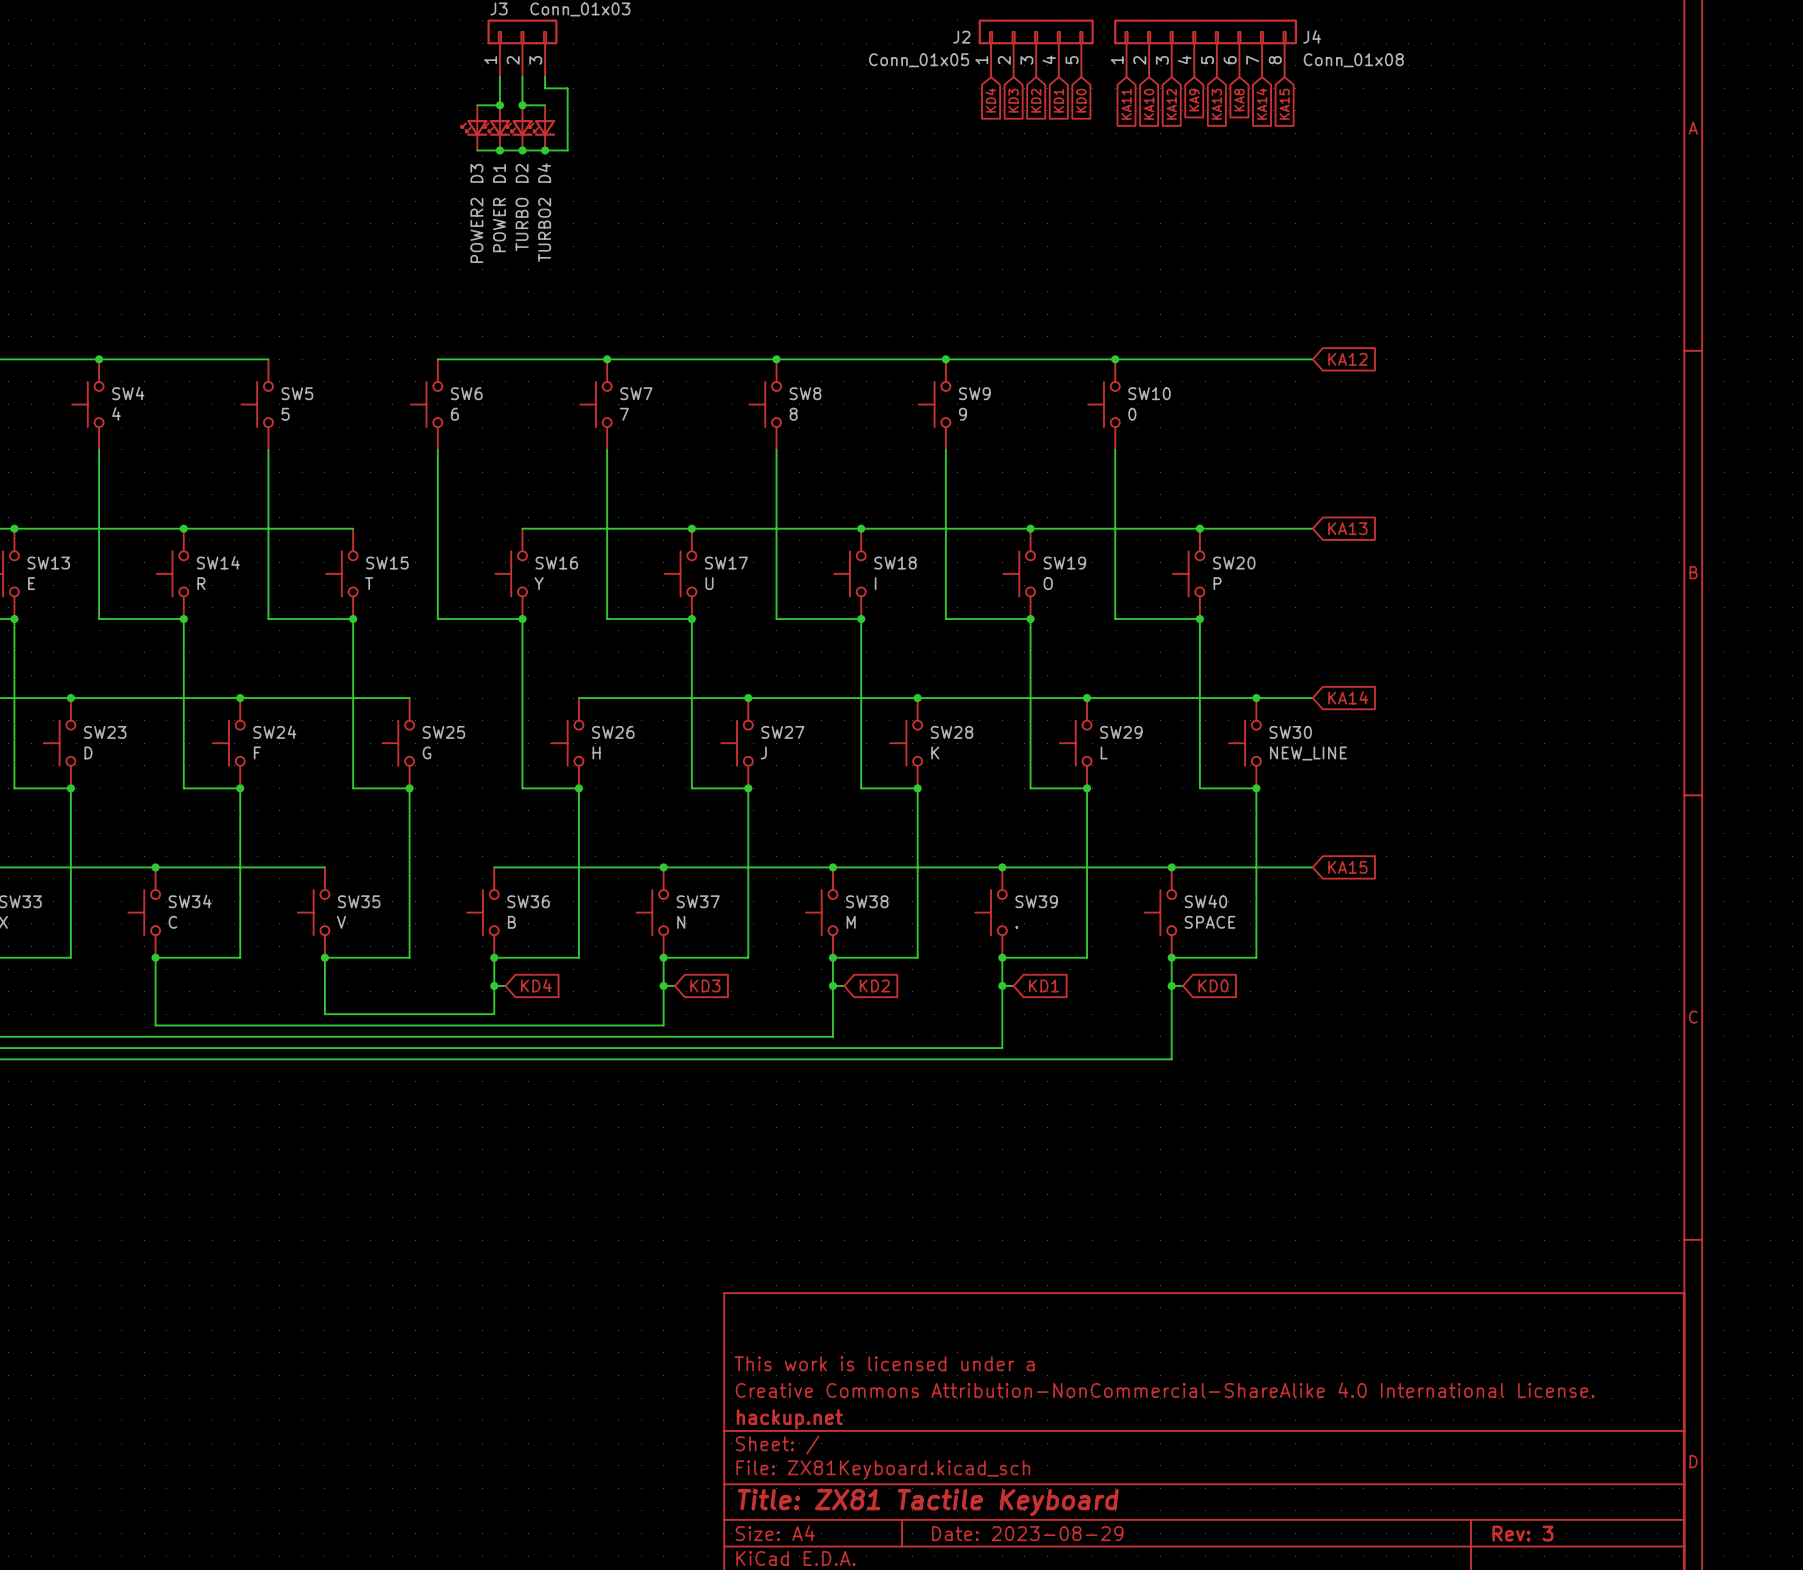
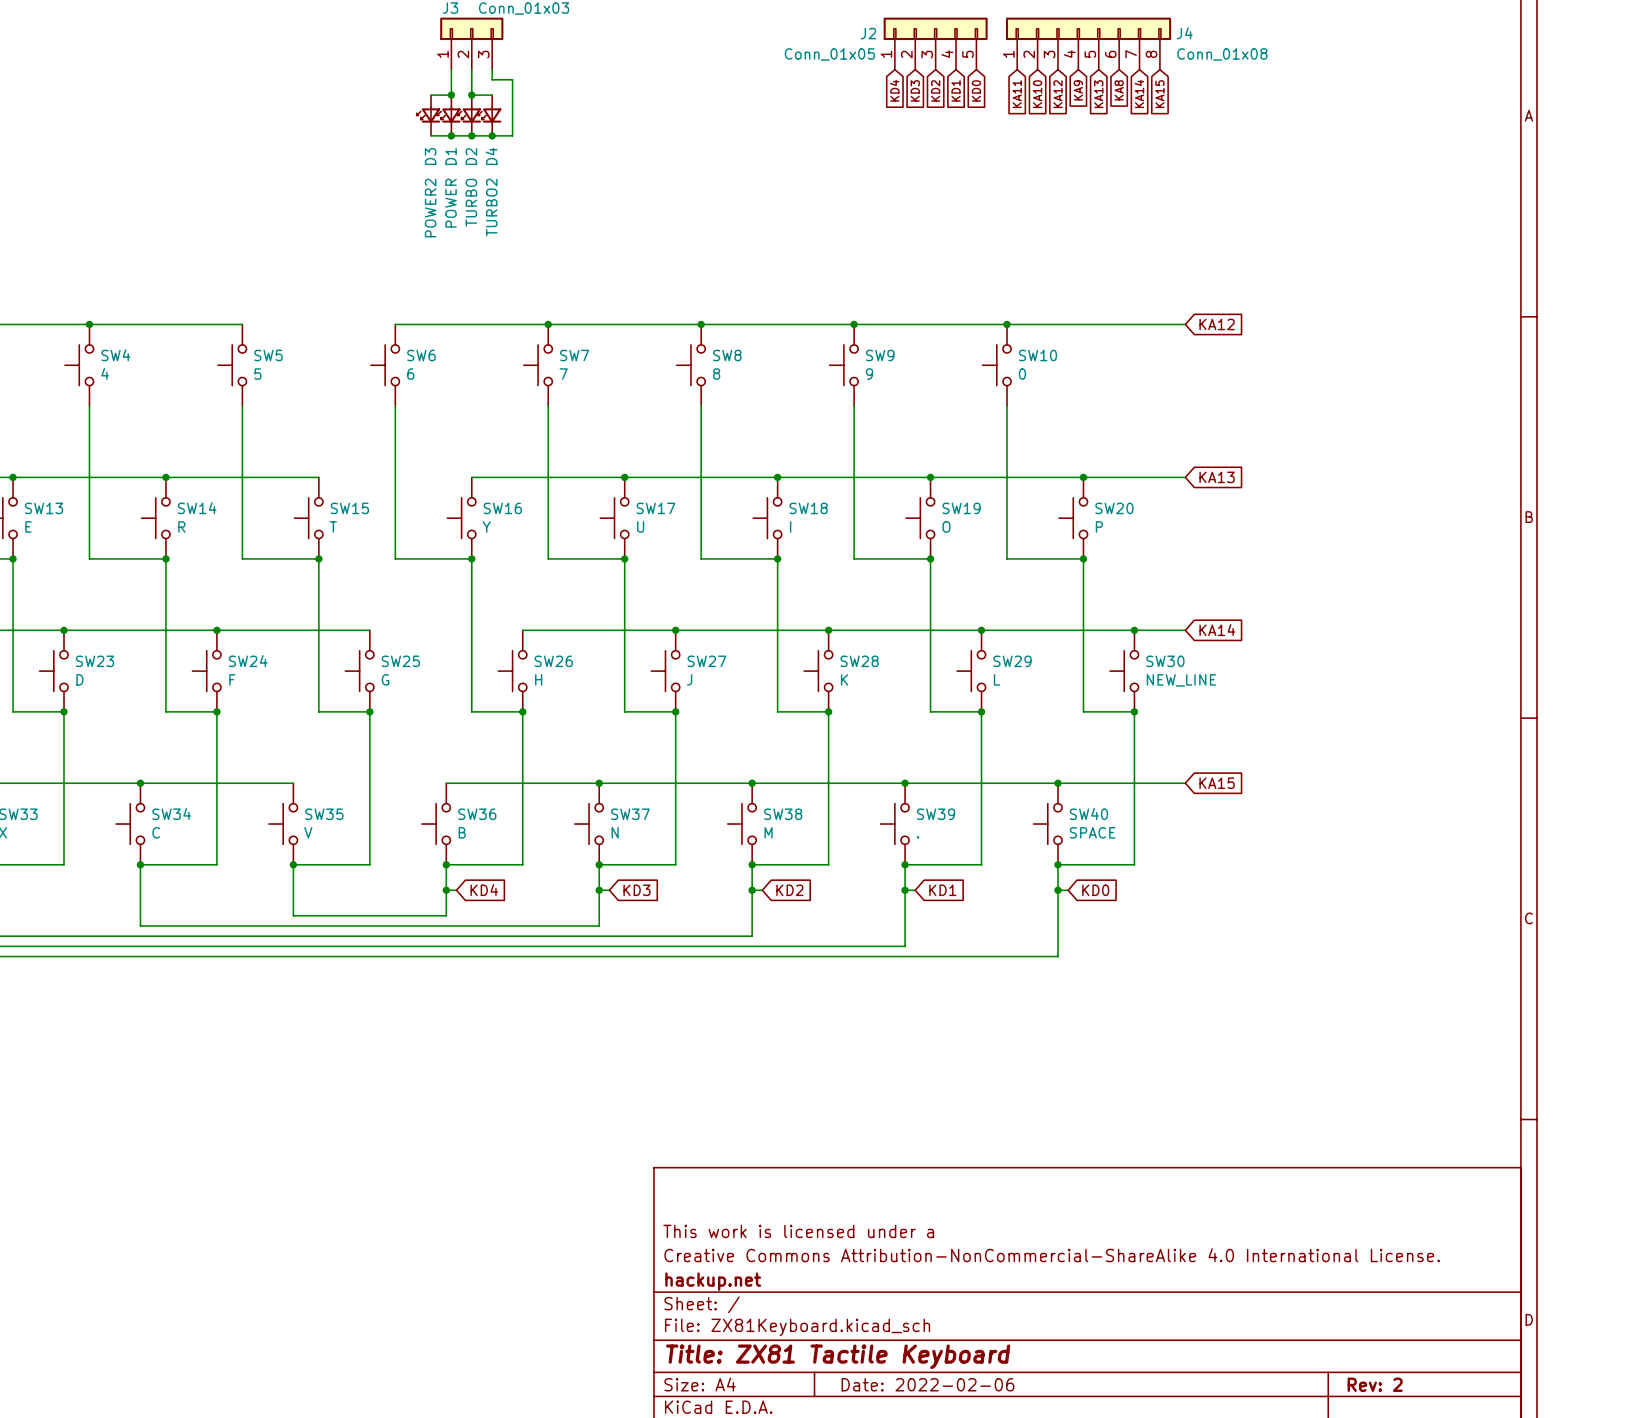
title block: Date: 2023-08-29 (1027, 1533) -> Date: 2022-02-06 (927, 1384)
title block: Rev: 3 (1522, 1533) -> Rev: 2 (1375, 1384)

